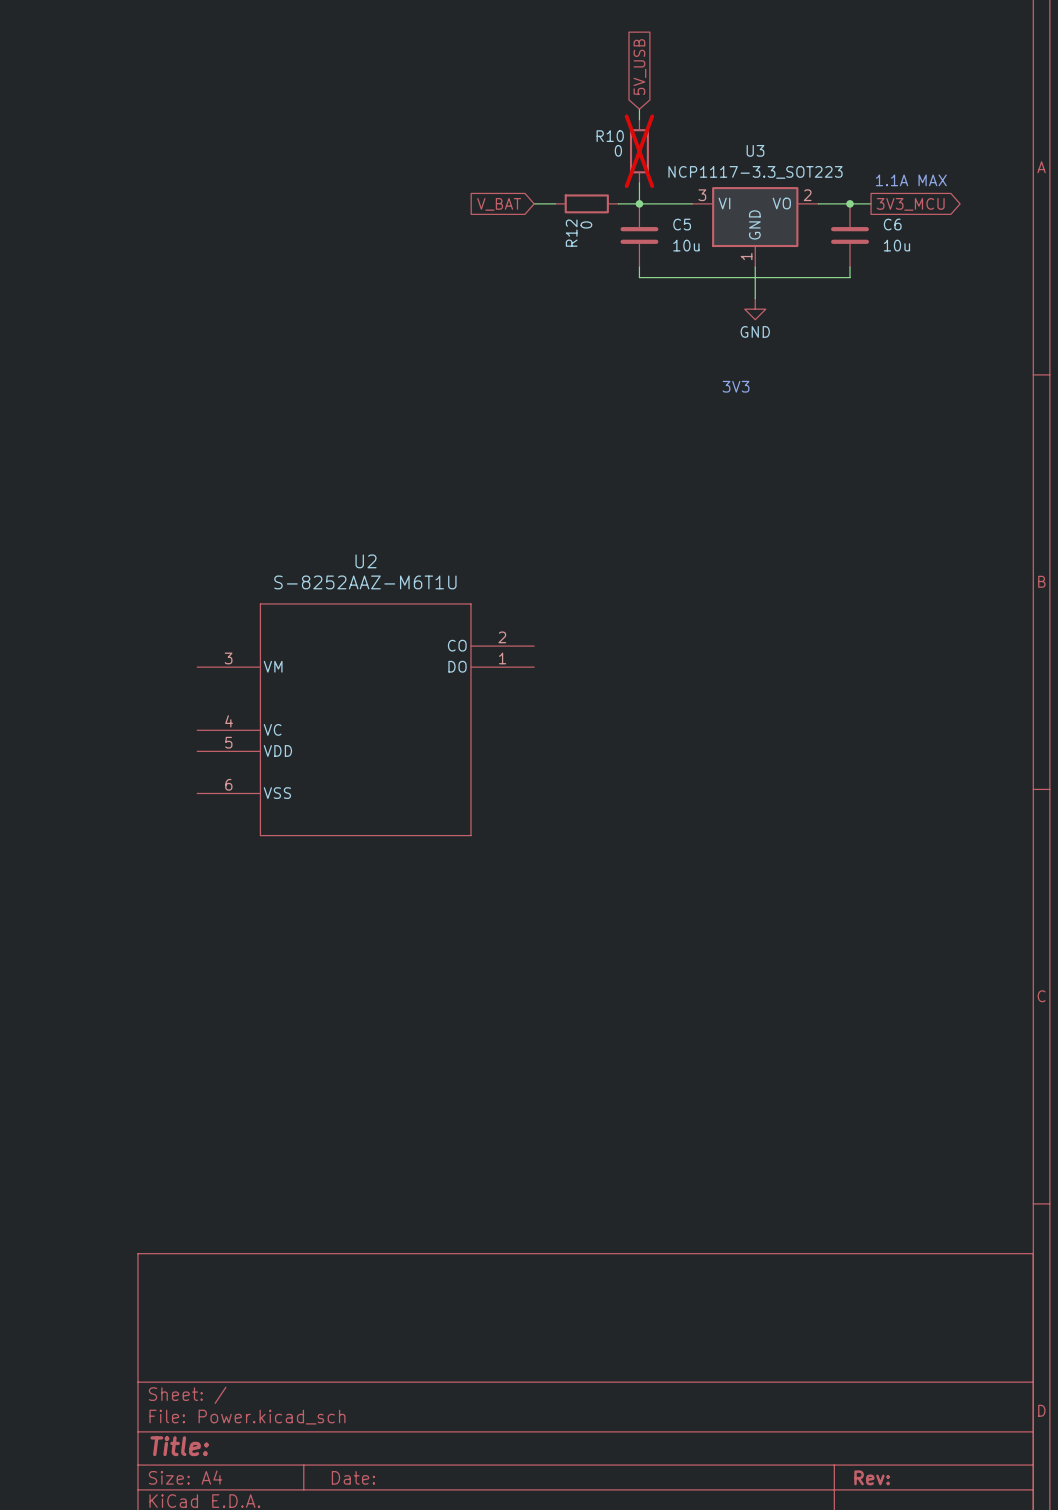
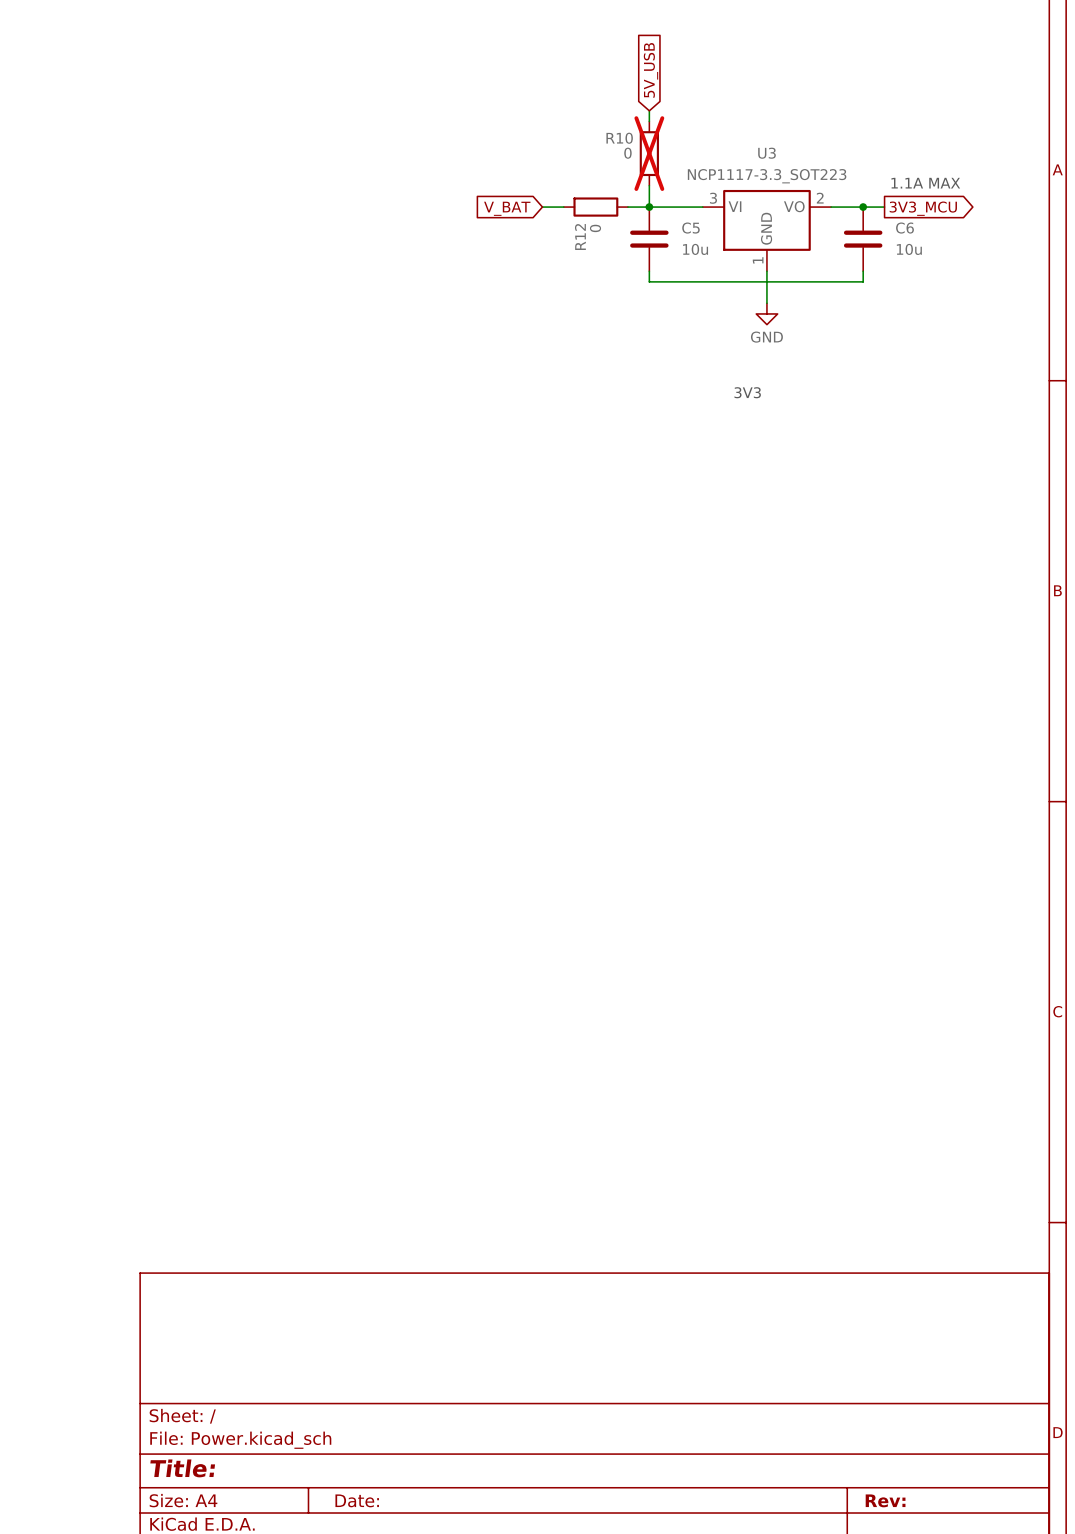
U2: S-8252AAZ-M6T1U (365, 719) -> none

